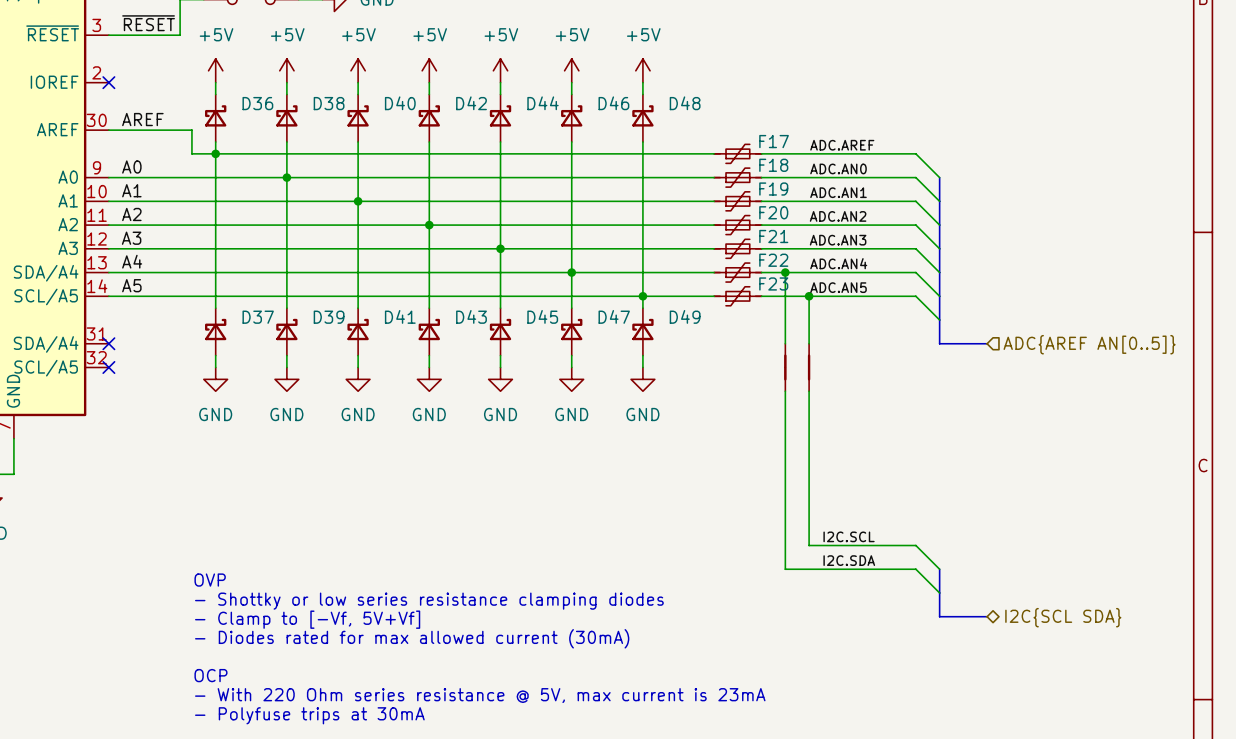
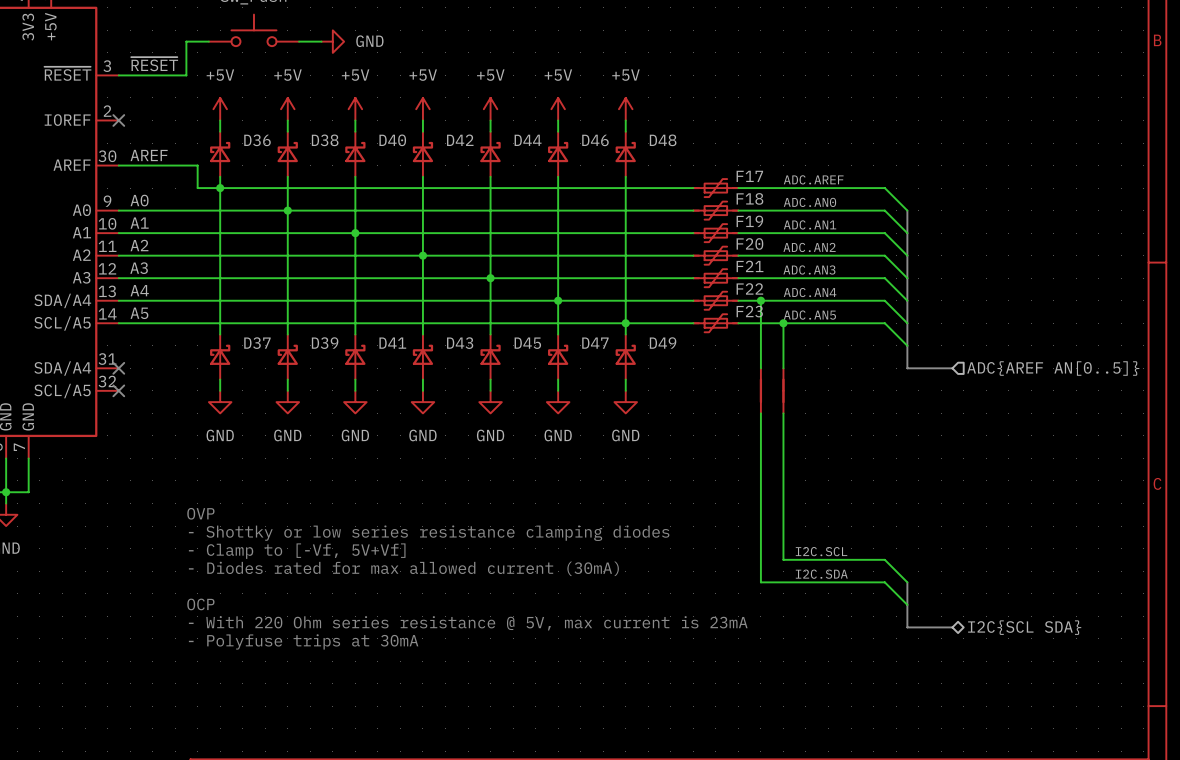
text position: OVP (210, 580) -> OVP (200, 513)
text position: - Shottky or low series resistance clamping diodes (429, 601) -> - Shottky or low series resistance clamping diodes (429, 533)
text position: - Clamp to [-Vf, 5V+Vf] (307, 619) -> - Clamp to [-Vf, 5V+Vf] (297, 551)
text position: - Diodes rated for max allowed current (30mA) (412, 638) -> - Diodes rated for max allowed current (30mA) (403, 568)
text position: OCP (210, 675) -> OCP (200, 604)
text position: - With 220 Ohm series resistance @ 5V, max current is 23mA (480, 695) -> - With 220 Ohm series resistance @ 5V, max current is 23mA (468, 623)
text position: - Polyfuse trips at 30mA (309, 715) -> - Polyfuse trips at 30mA (303, 641)

